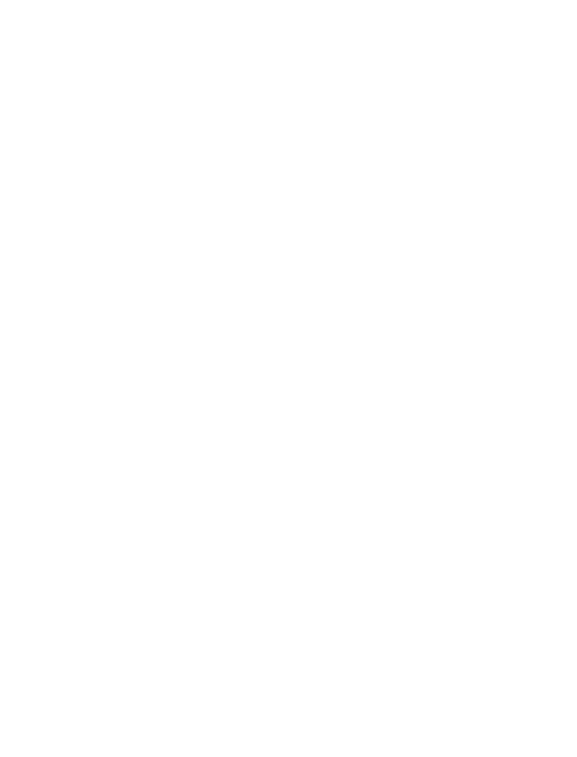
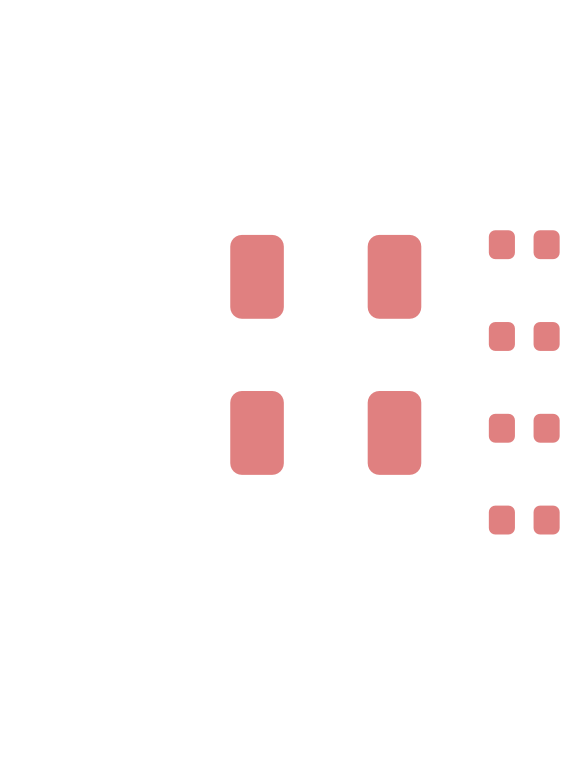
part: none -> (524, 244)
part: none -> (325, 276)
part: none -> (524, 336)
part: none -> (524, 428)
part: none -> (325, 432)
part: none -> (524, 520)

